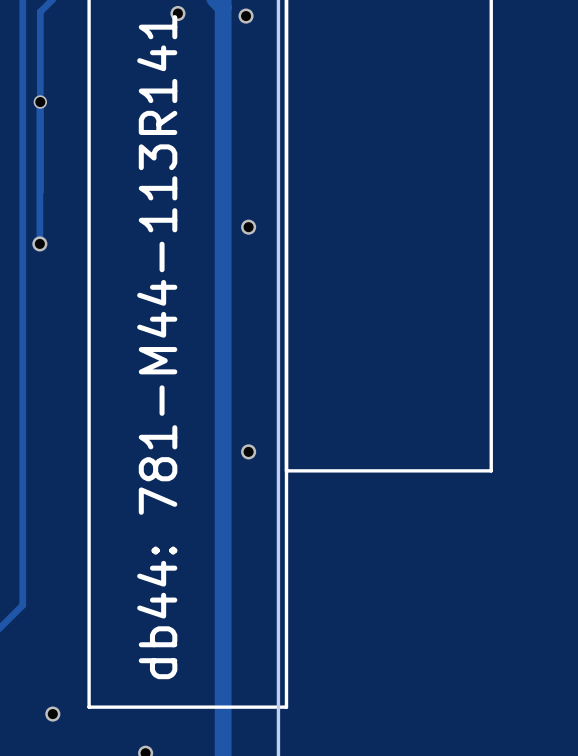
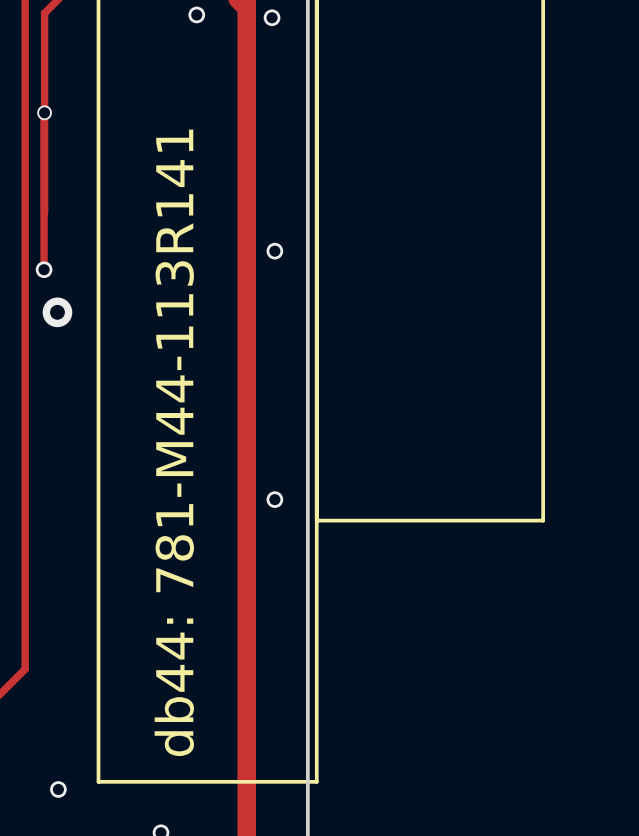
via: none -> (57, 312)

